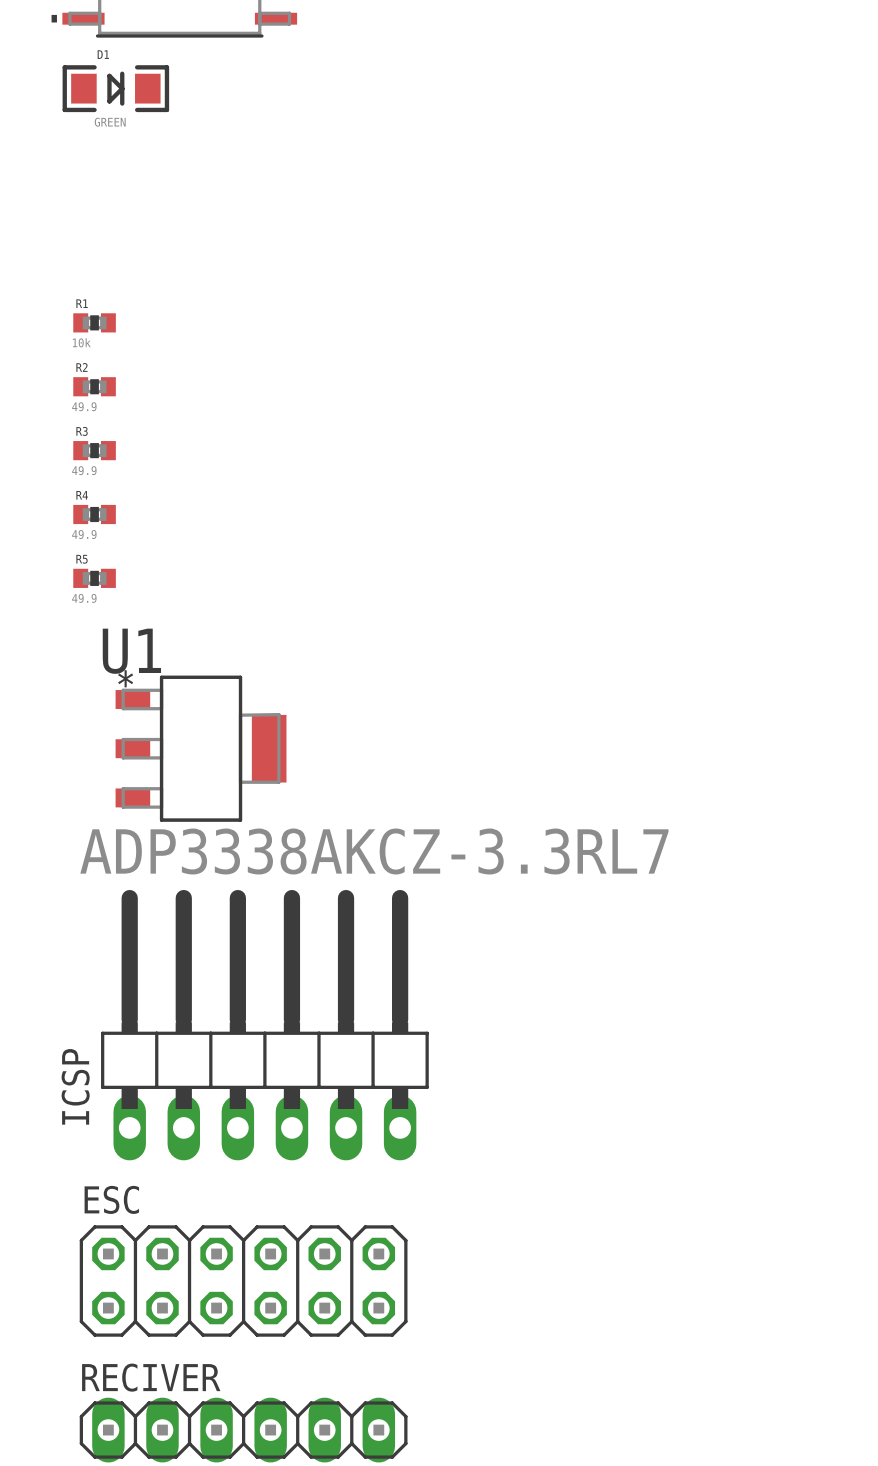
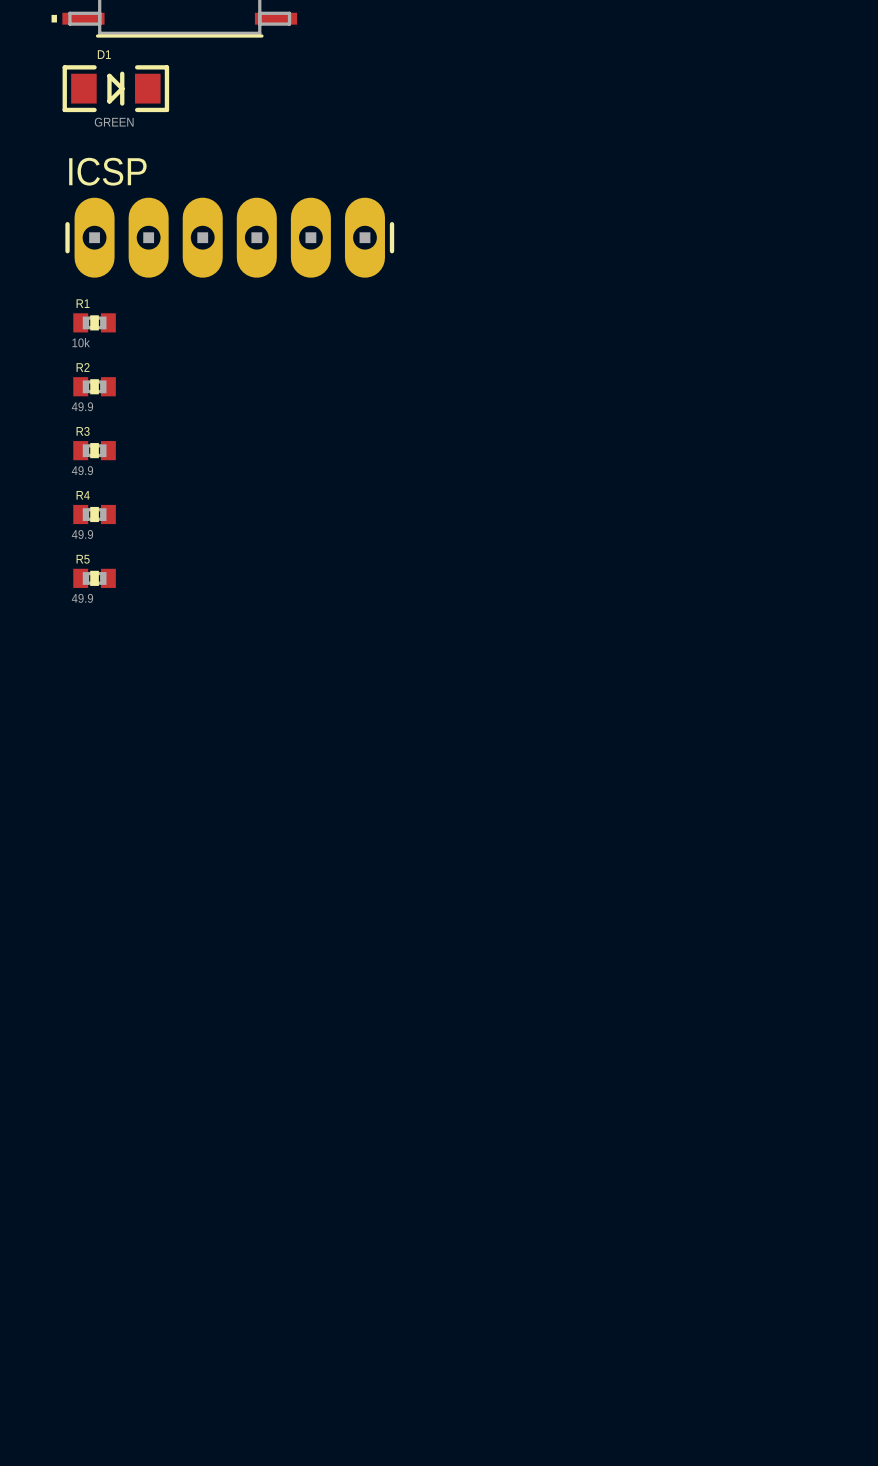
ICSP: none -> (229, 237)
U1: ADP3338AKCZ-3.3RL7 (201, 748) -> none
ICSP: (264, 1025) -> none
ESC: (243, 1281) -> none
RECIVER: (243, 1430) -> none

